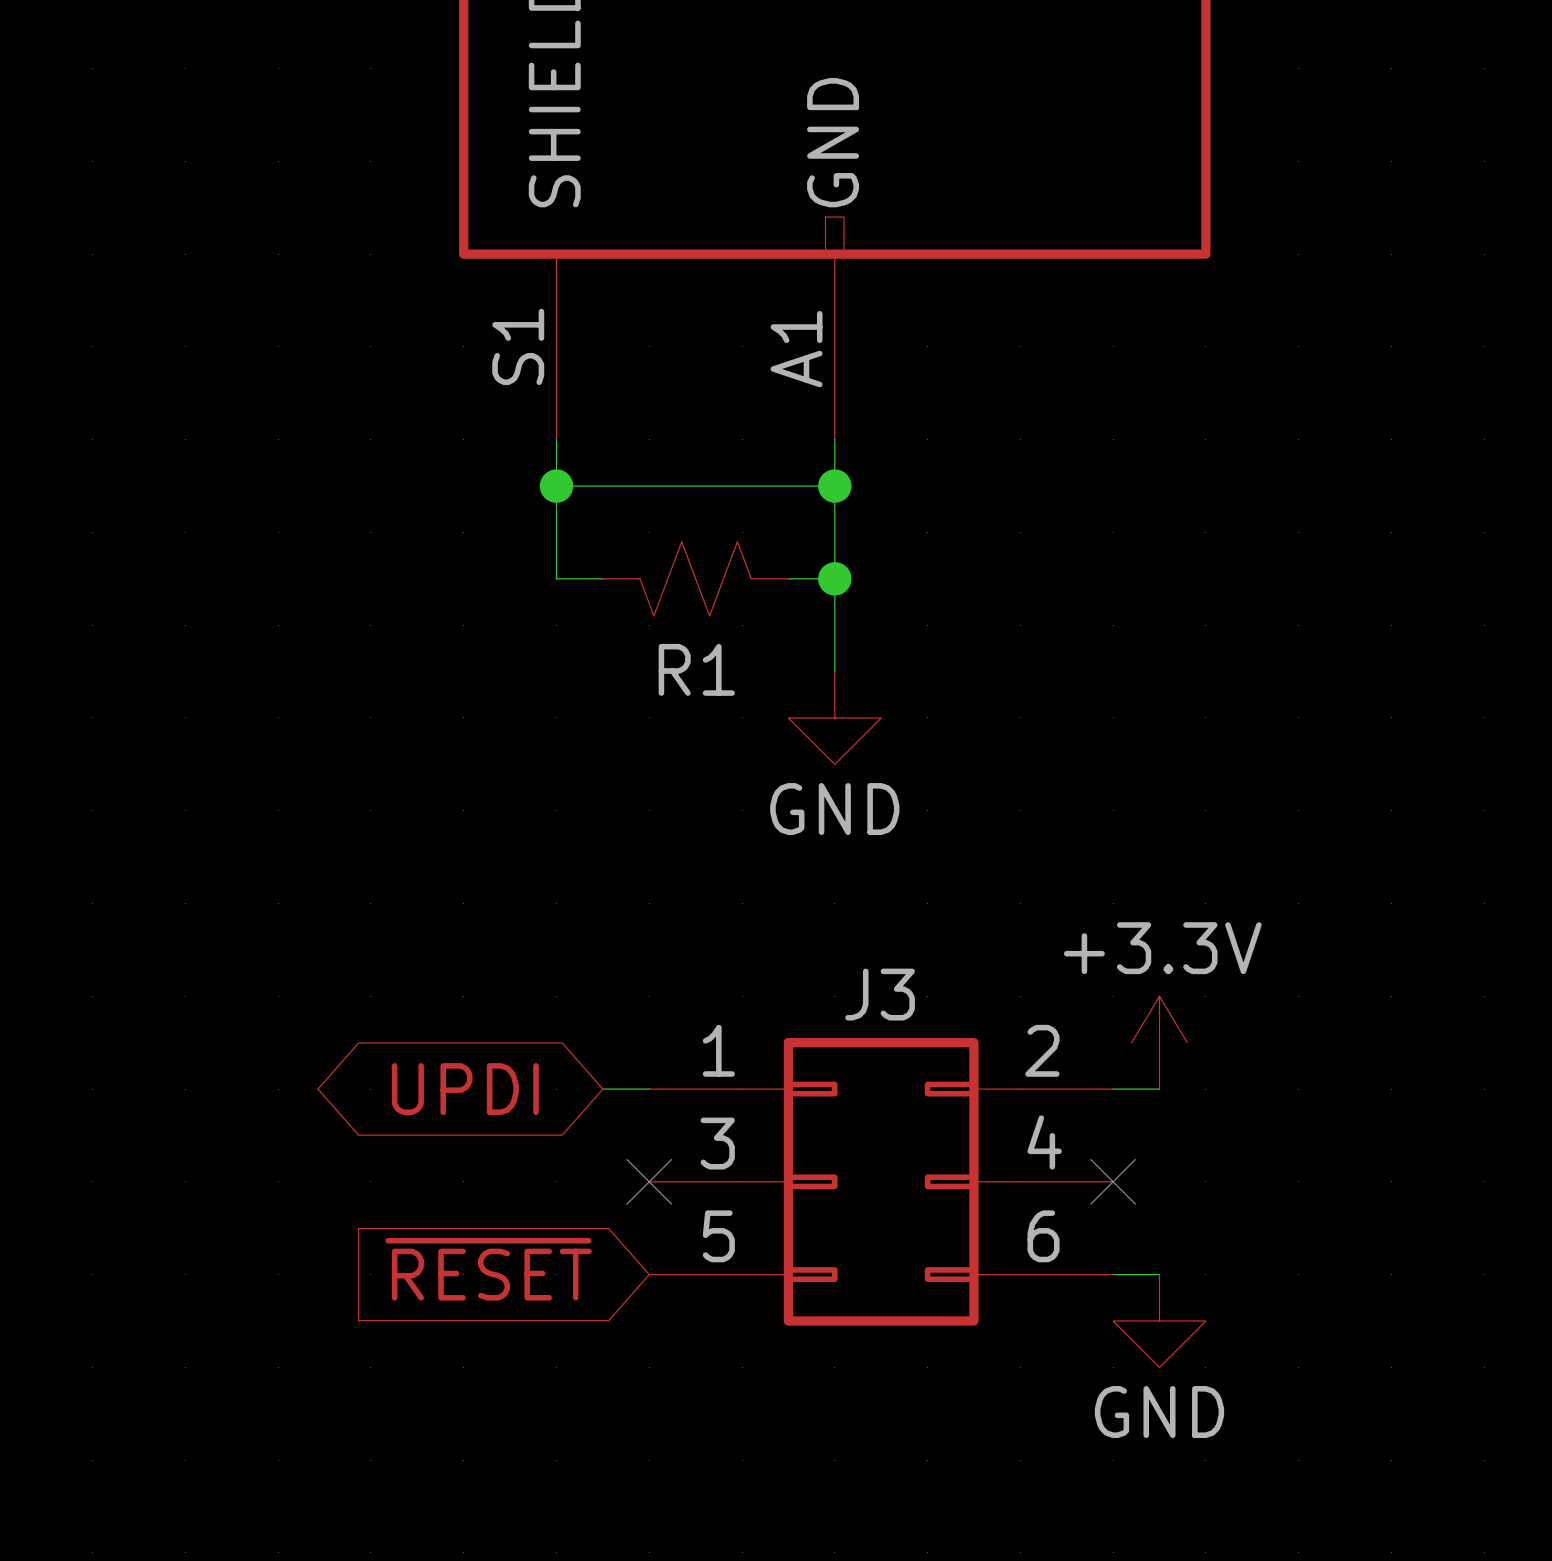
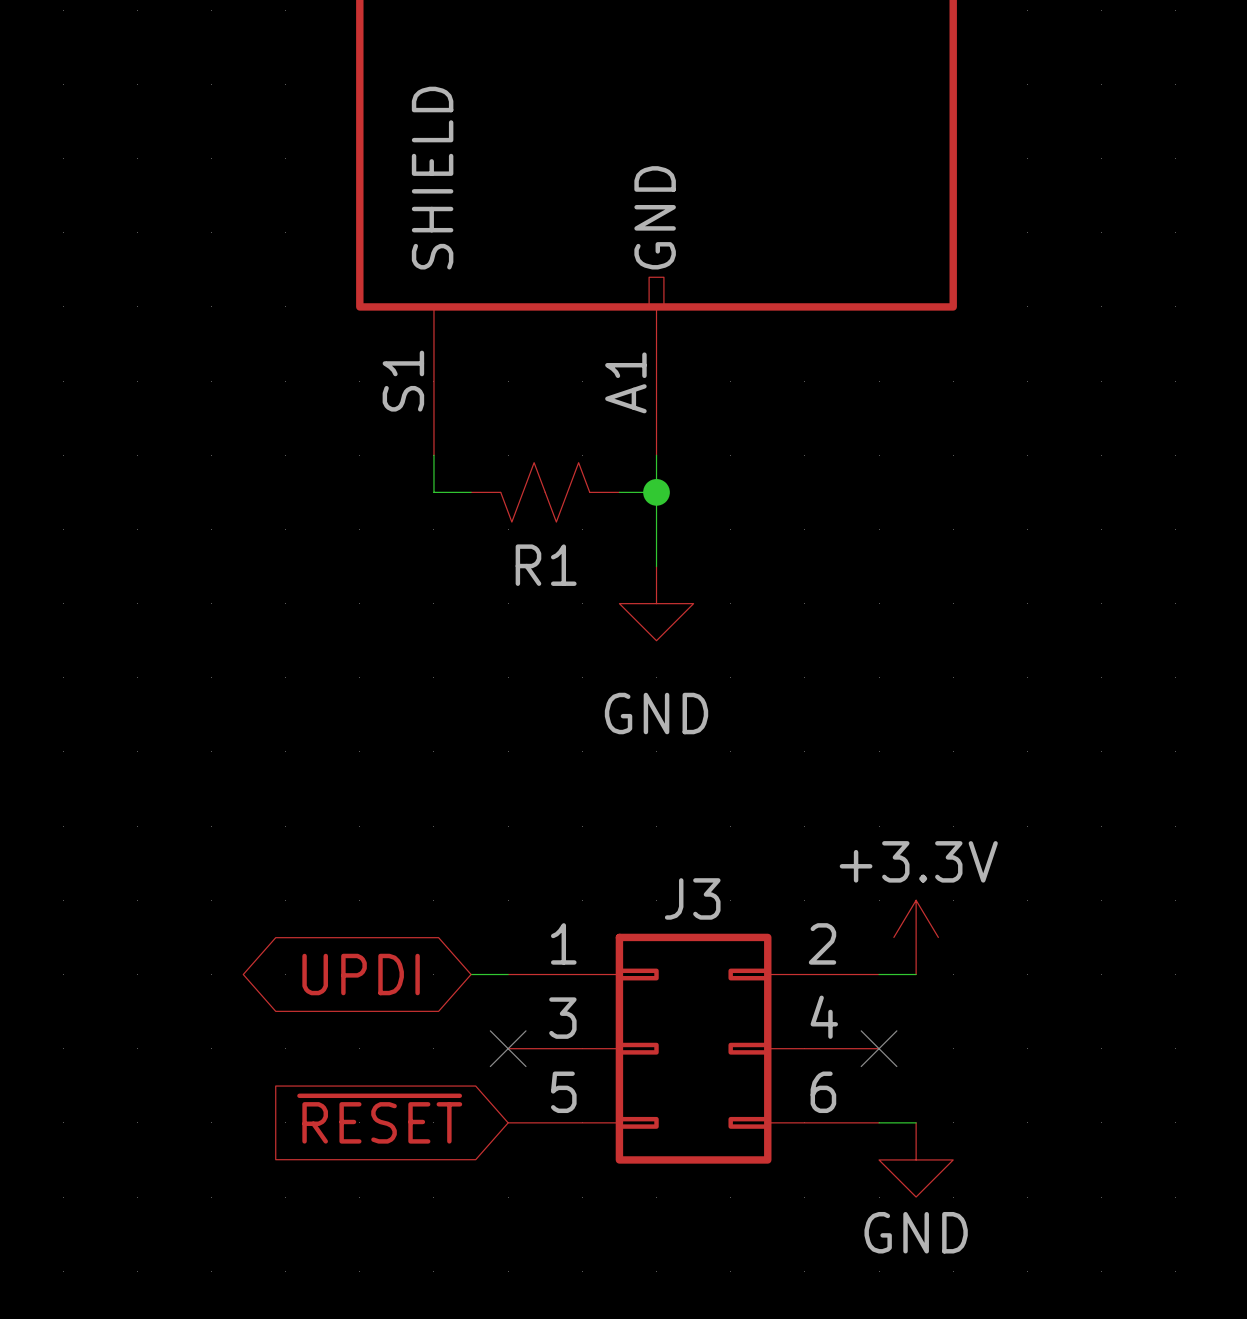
wire: (556, 486) (556, 578) (602, 578) -> none
junction: (556, 486) -> none
wire: (602, 486) (788, 486) -> none
R1 position: (695, 578) -> (545, 492)
wire: (788, 578) (834, 578) (834, 671) -> none
junction: (834, 578) -> none
power symbol position: GND (834, 717) -> GND (656, 603)
power symbol text position: GND (834, 809) -> GND (656, 713)

